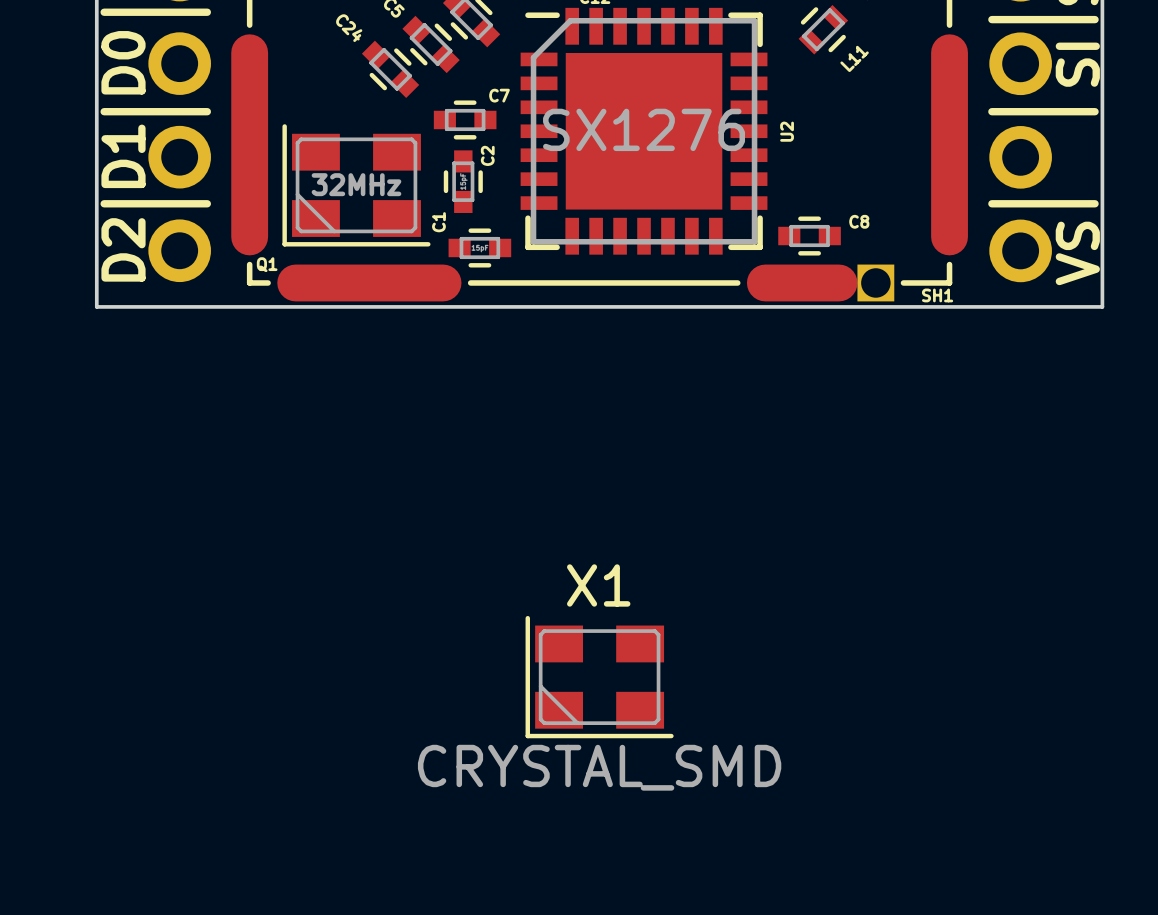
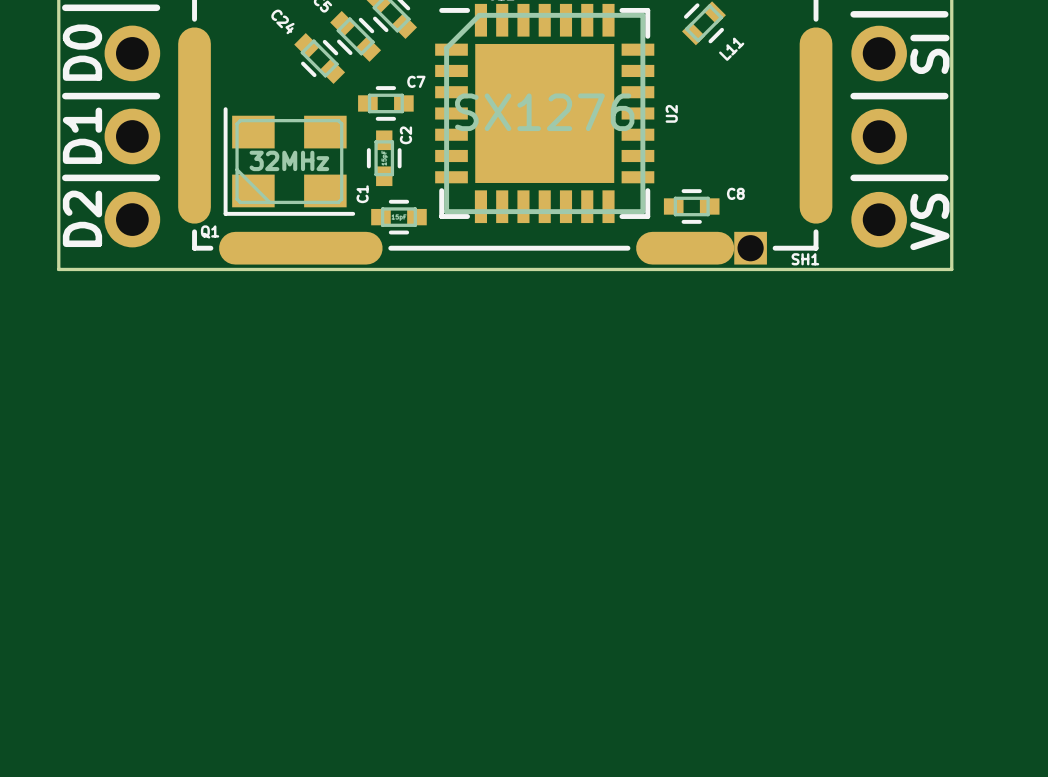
X1: CRYSTAL_SMD (599, 677) -> none

